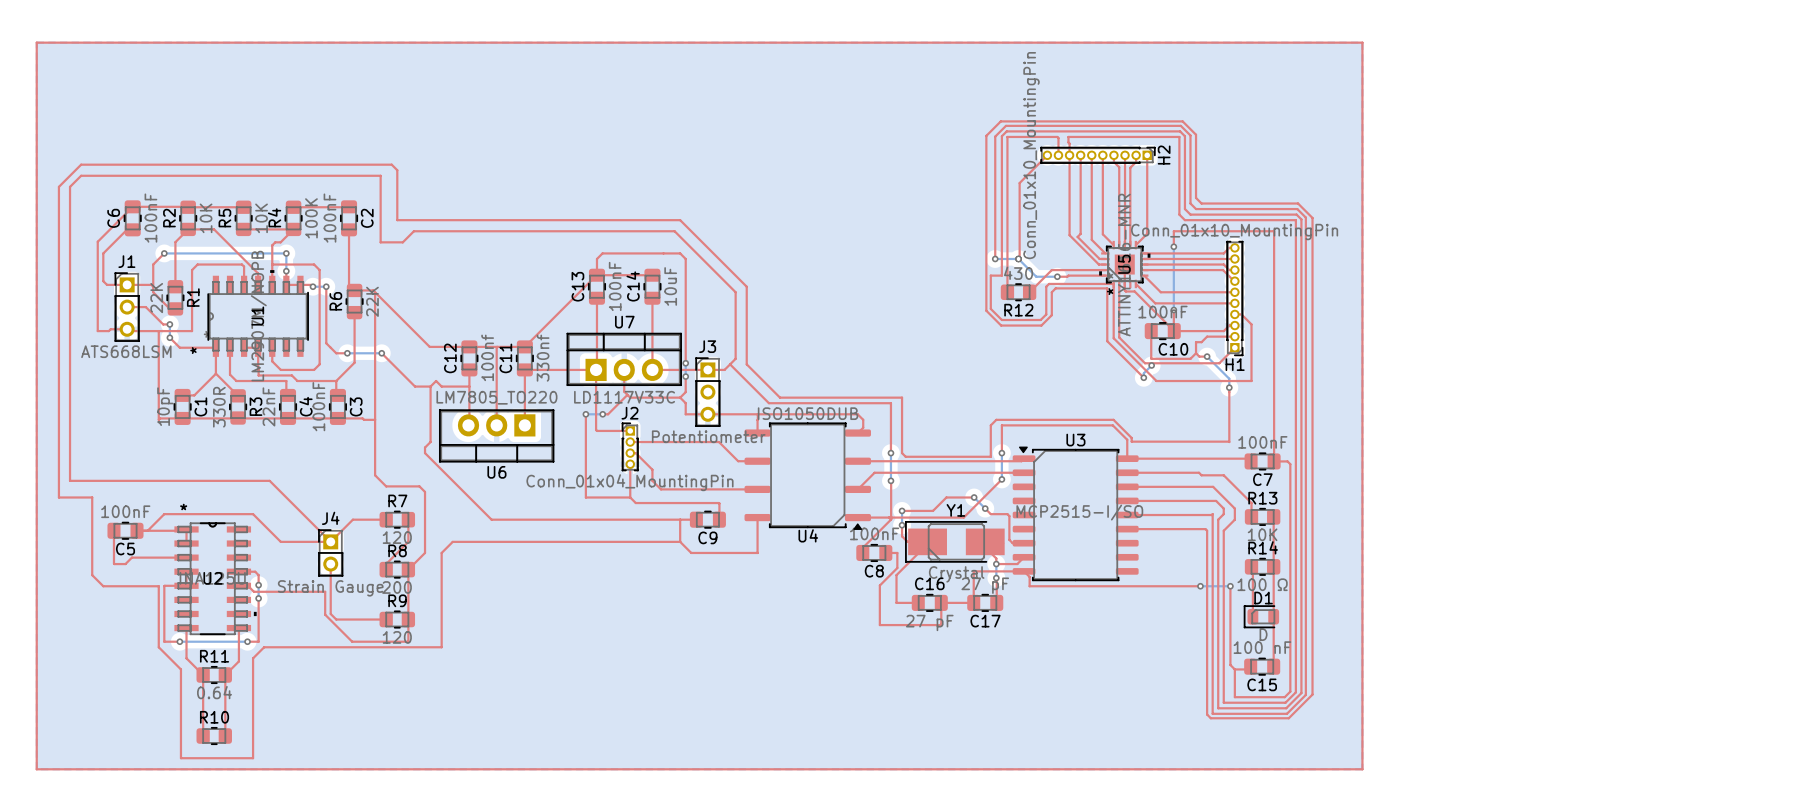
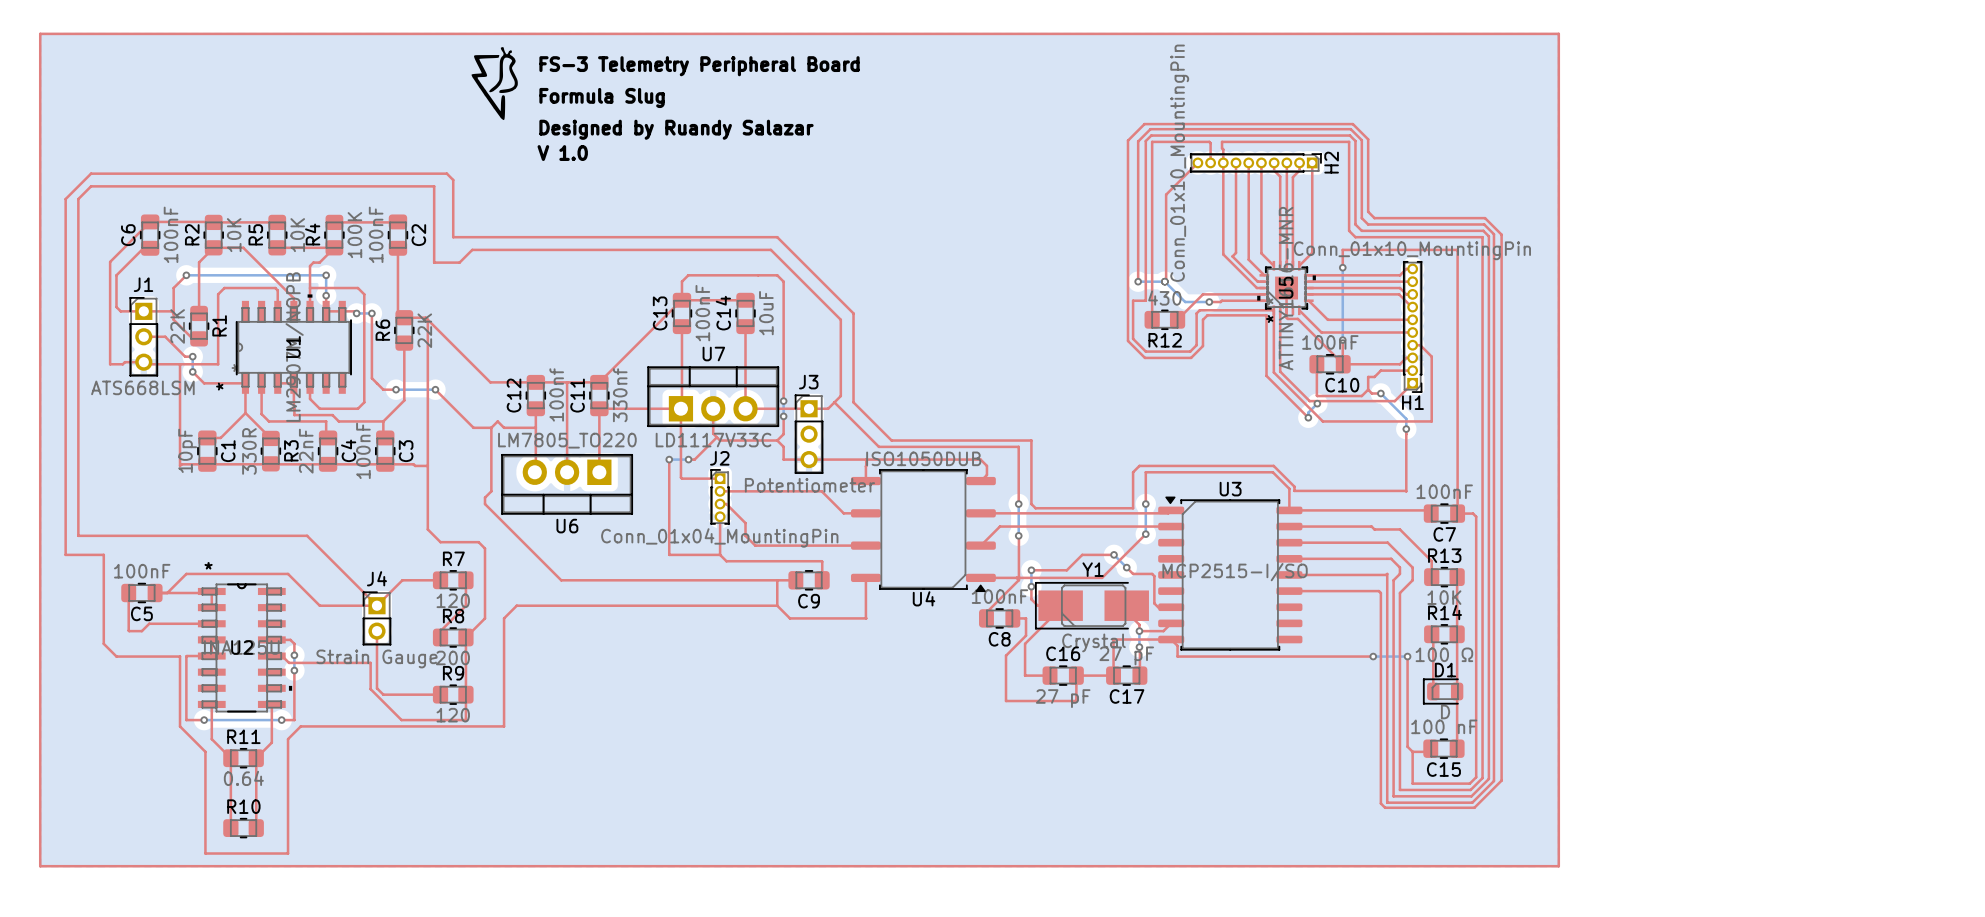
drawing: none -> [471, 47, 518, 121]
text: none -> FS-3 Telemetry Peripheral Board (699, 66)
text: none -> Formula Slug (602, 97)
text: none -> Designed by Ruandy Salazar (676, 129)
text: none -> V 1.0 (562, 153)

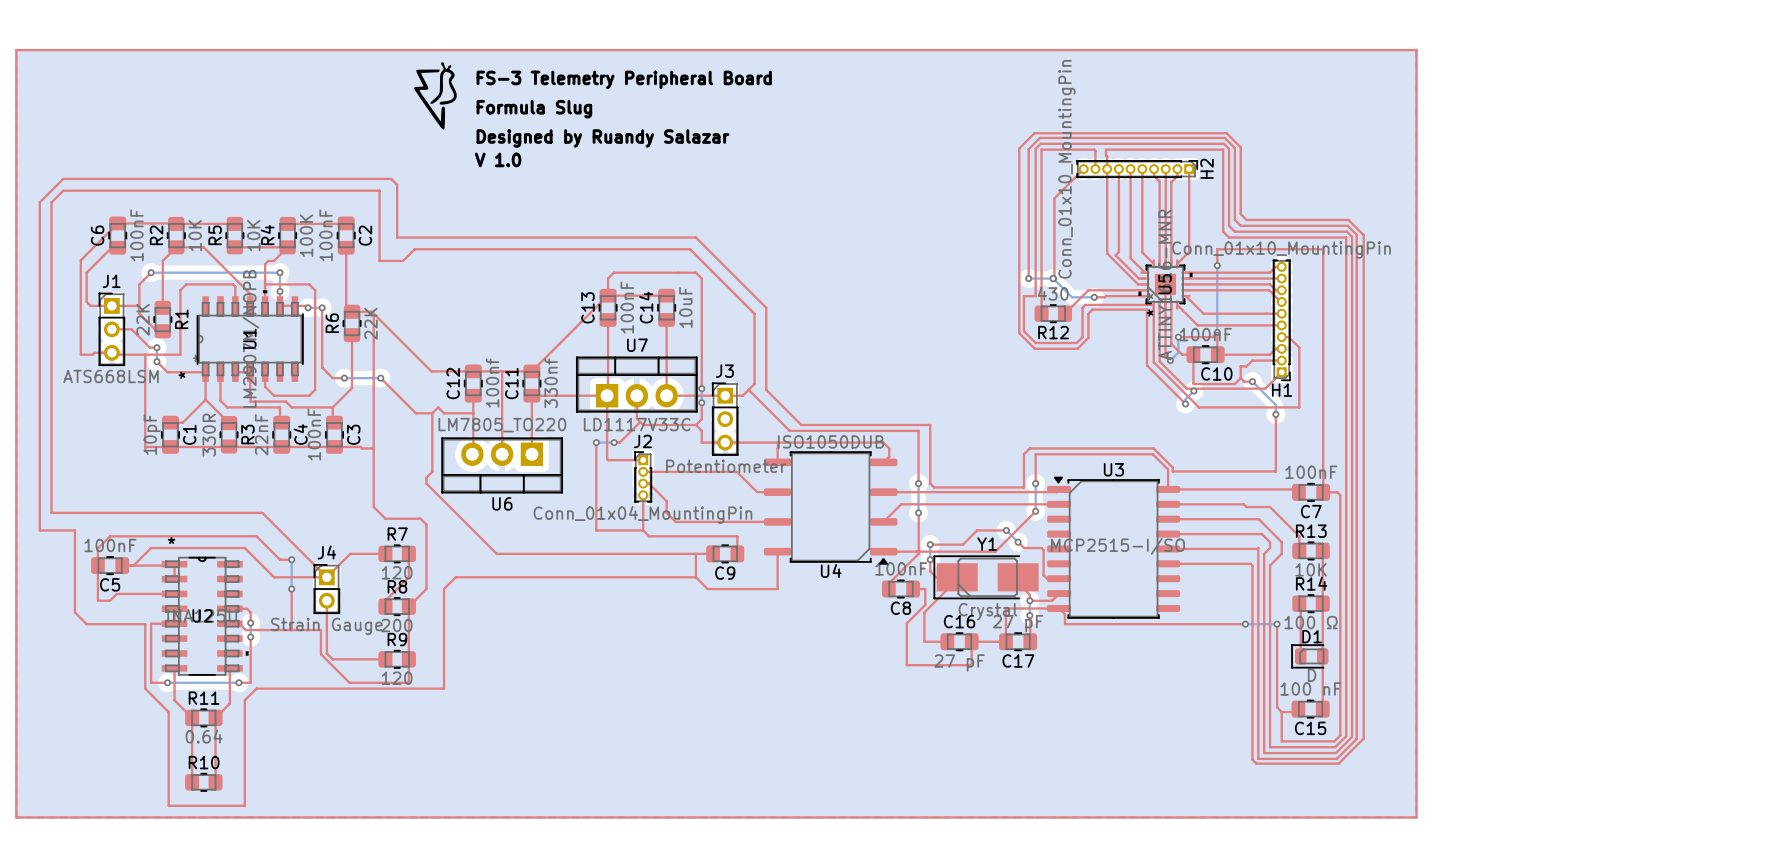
top track: none -> (1171, 304) (1171, 343) (1182, 354) (1193, 354)
top track: (1286, 317) (1297, 318) (1342, 363) -> (1165, 311) (1165, 355) (1170, 360)
top track: none -> (1217, 332) (1212, 337) (1178, 337)
bottom track: none -> (1178, 337) (1178, 352) (1170, 360)
via: none -> (1178, 337)
via: none -> (1170, 360)
top track: none -> (291, 559) (279, 559) (256, 536) (110, 536) (97, 548) (97, 565)
bottom track: none -> (291, 559) (291, 589)
via: none -> (291, 559)
top track: none -> (291, 589) (291, 630)
via: none -> (291, 589)

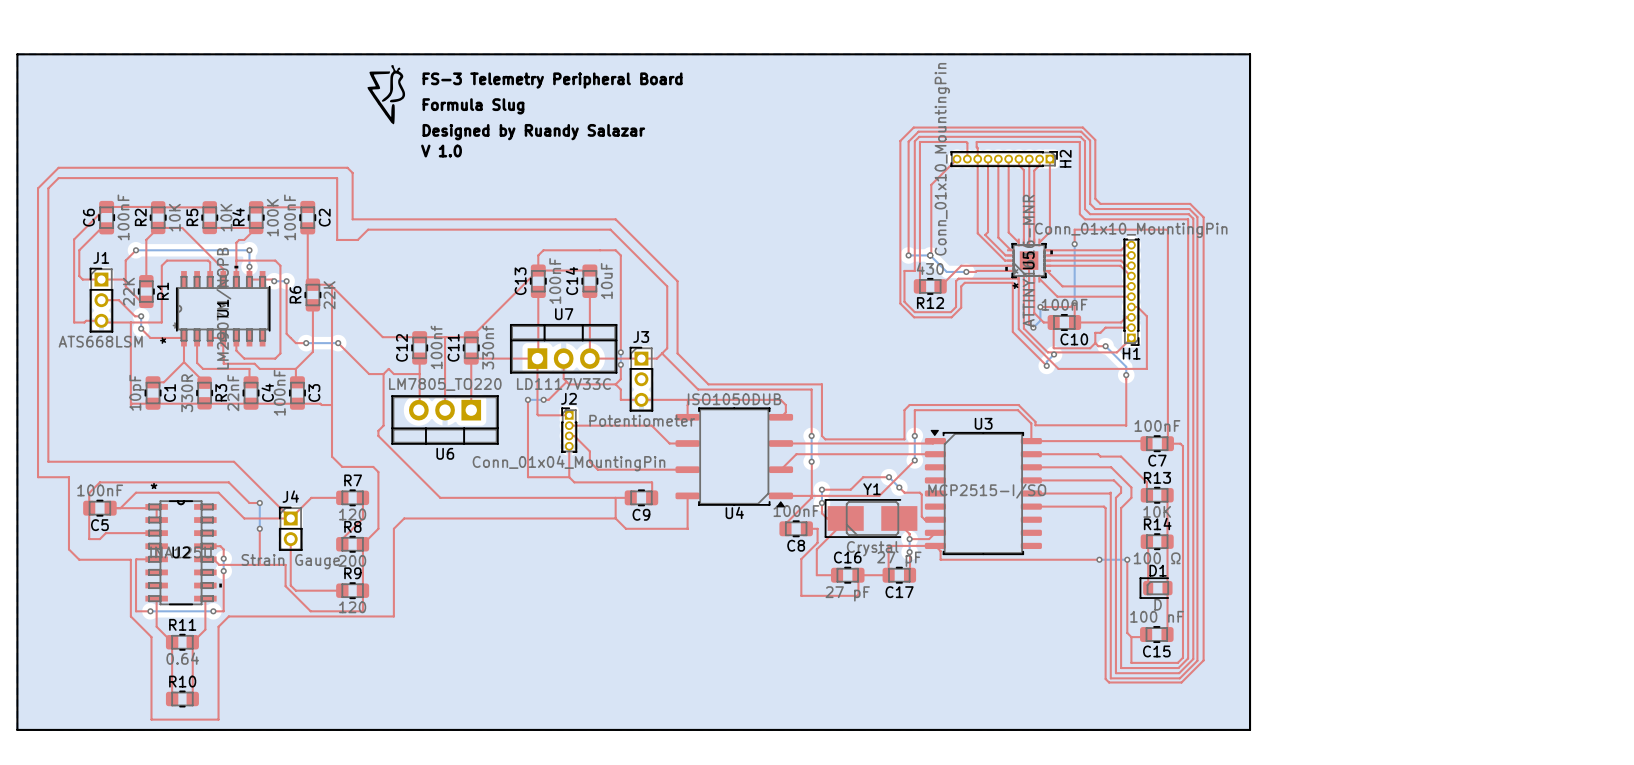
top track: (16, 50) (1416, 50) (1416, 817) (16, 817) (16, 50) -> none
board edge: none -> (17, 54) (1250, 54) (1250, 729) (17, 729) (17, 54)

